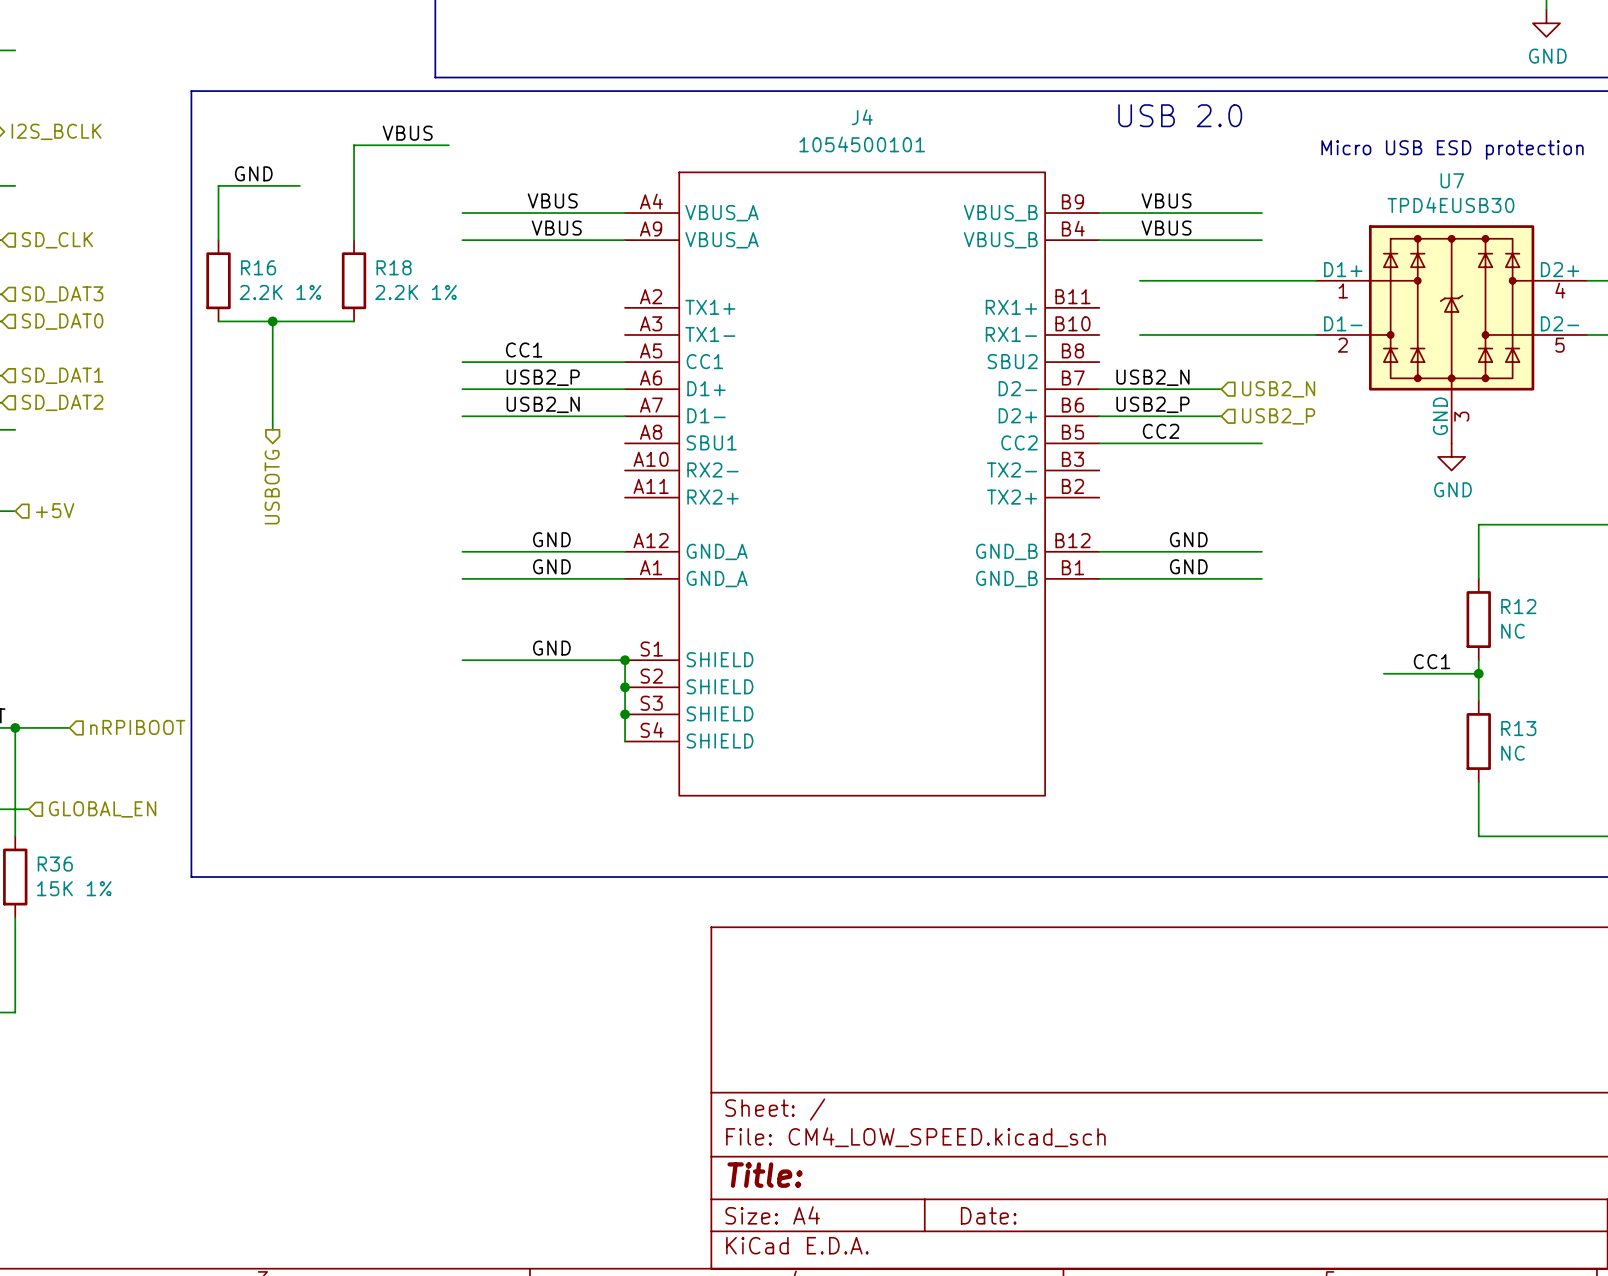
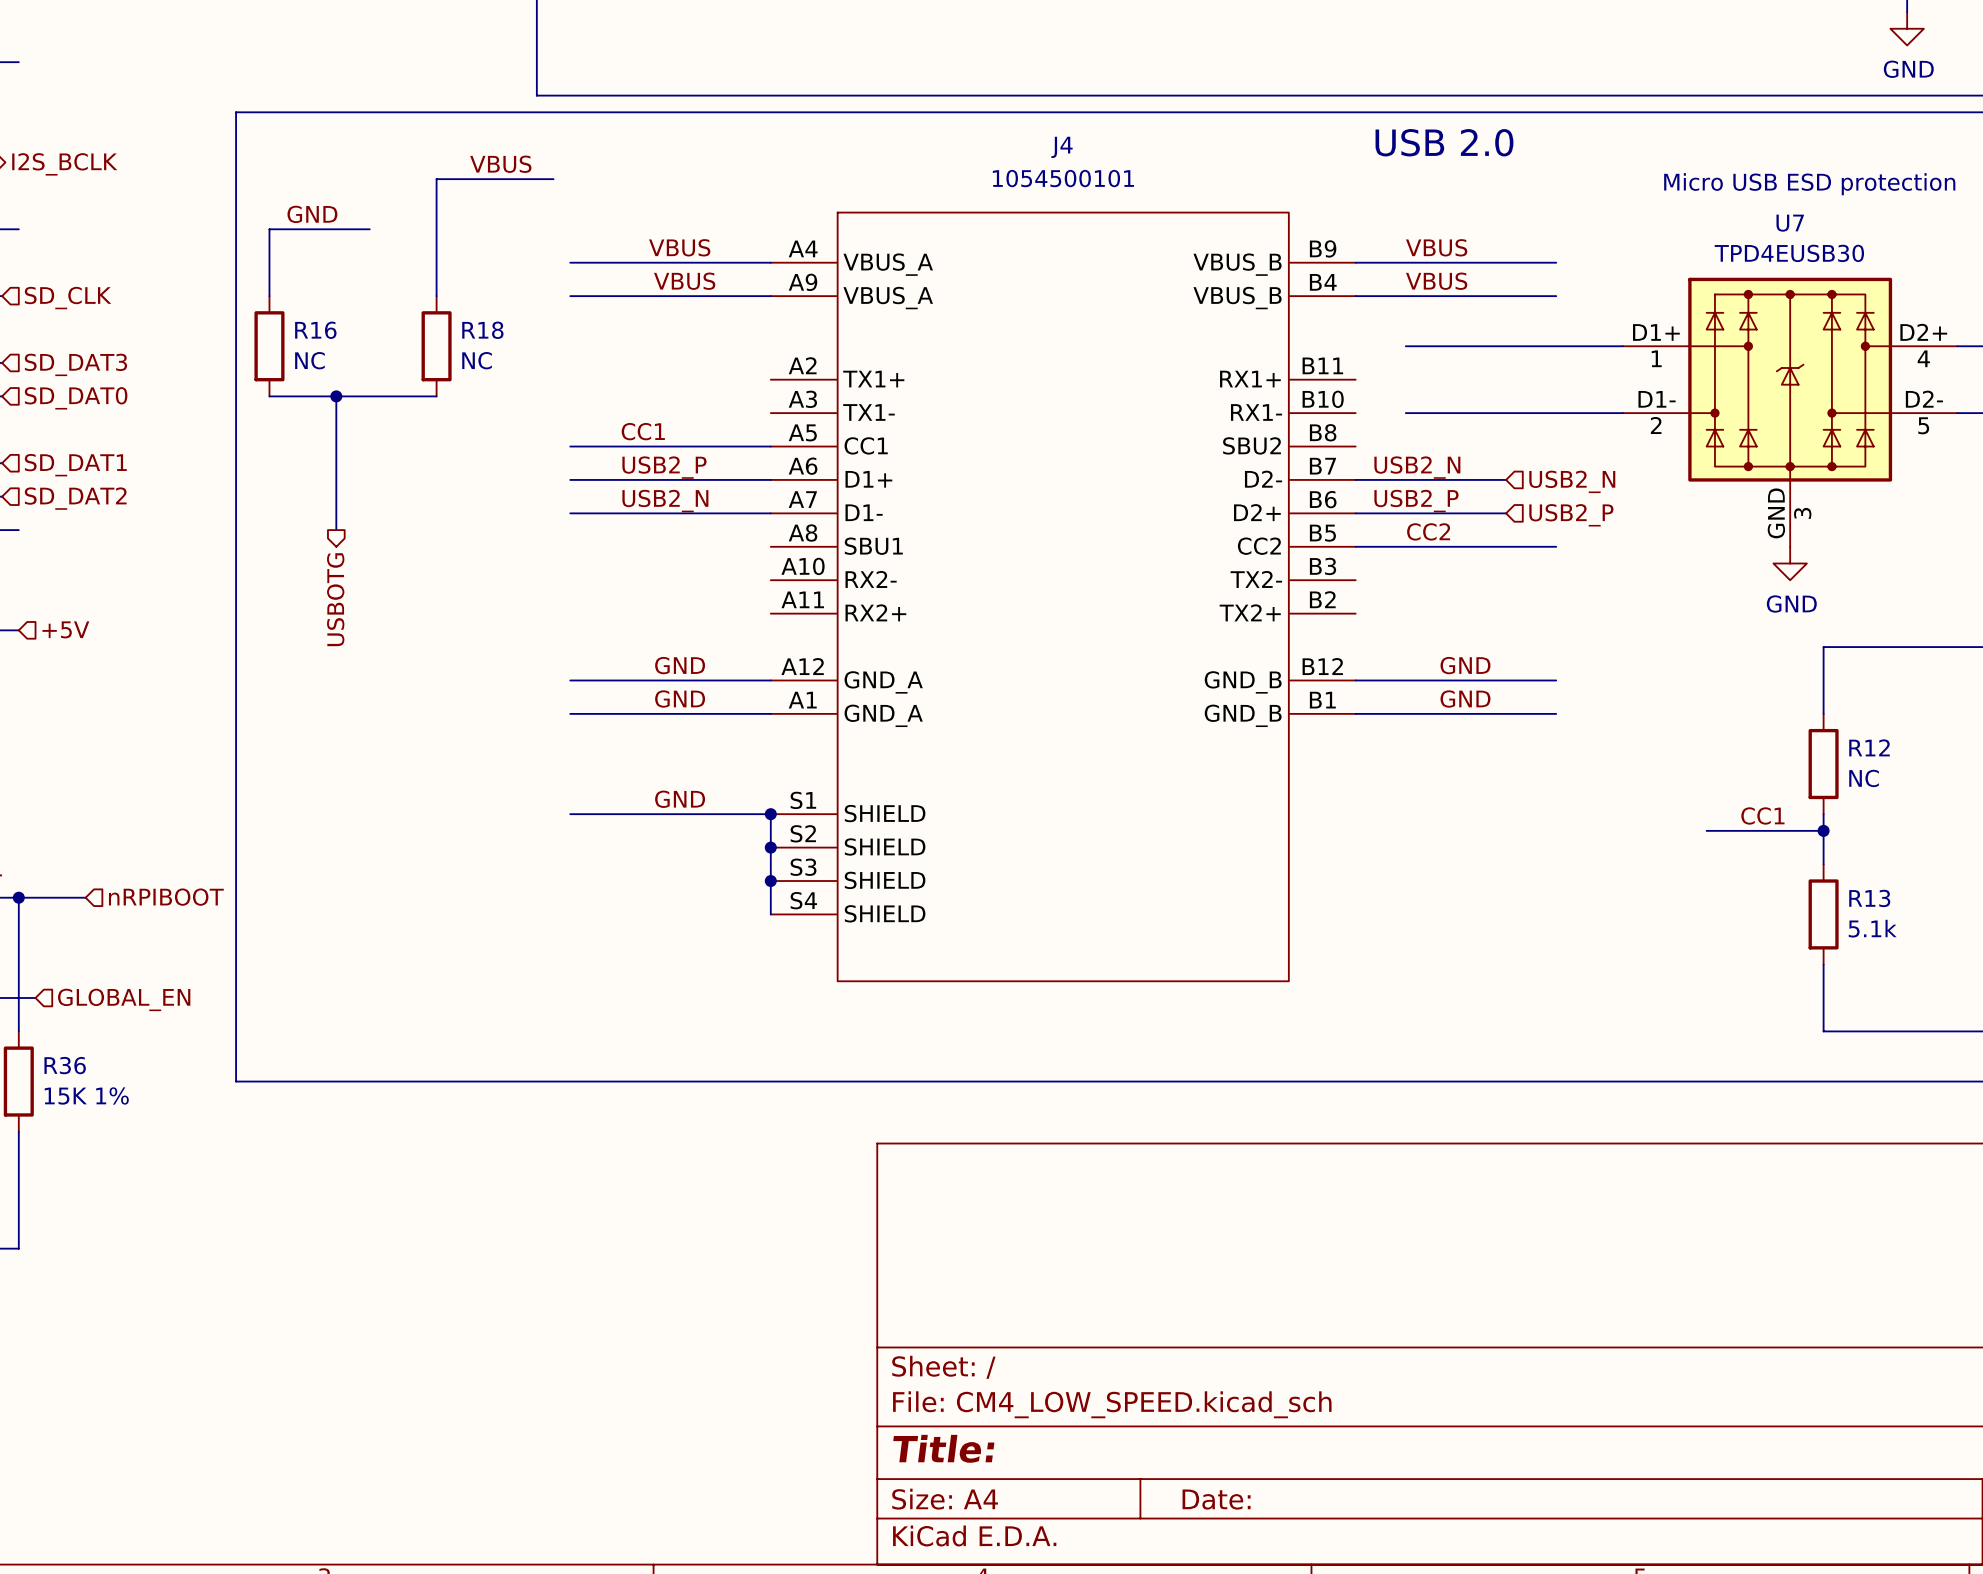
R16 value: 2.2K 1% (280, 292) -> NC (309, 360)
R18 value: 2.2K 1% (416, 292) -> NC (477, 360)
R13 value: NC (1512, 753) -> 5.1k (1872, 928)

